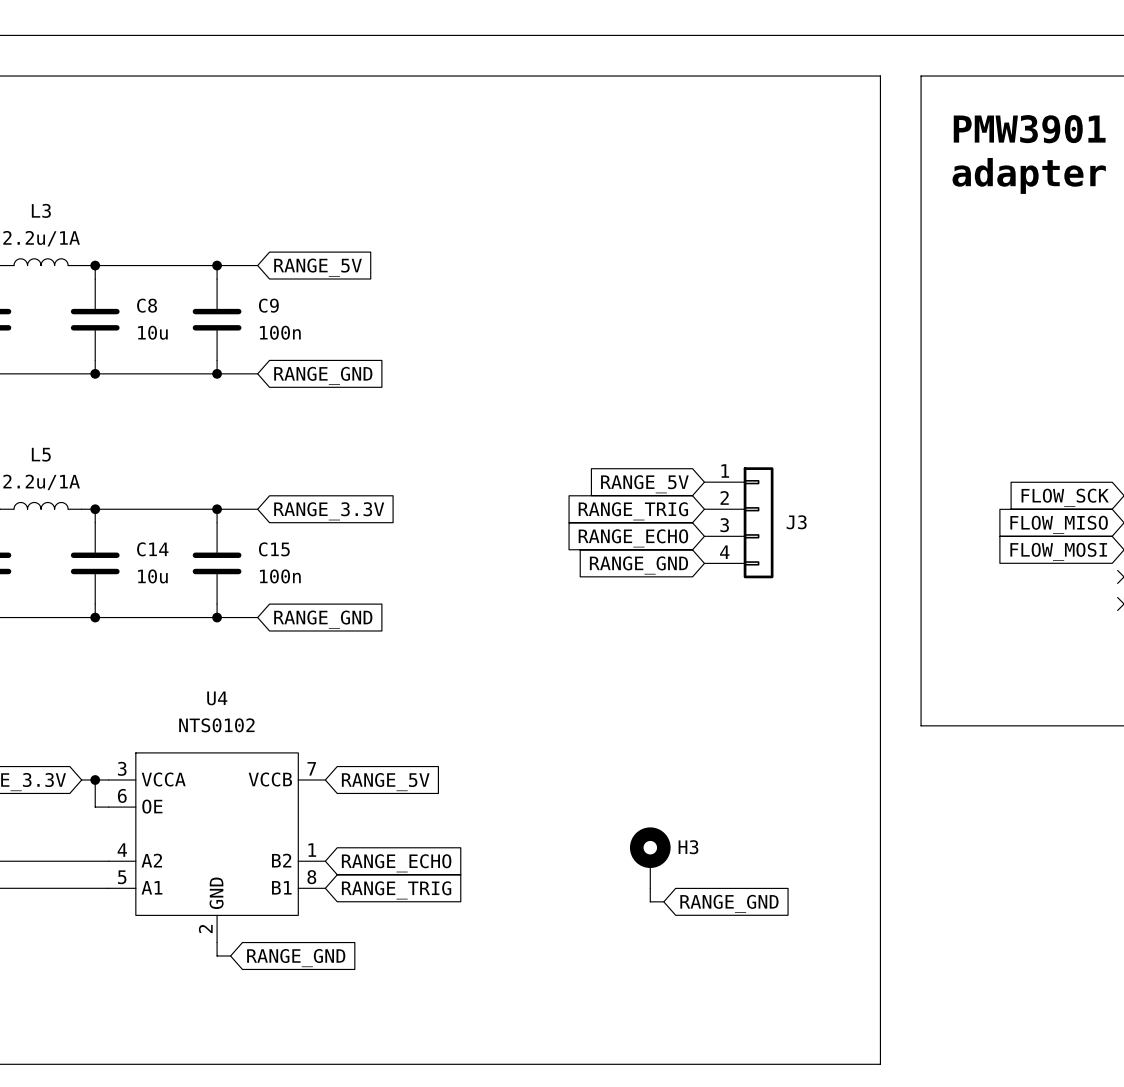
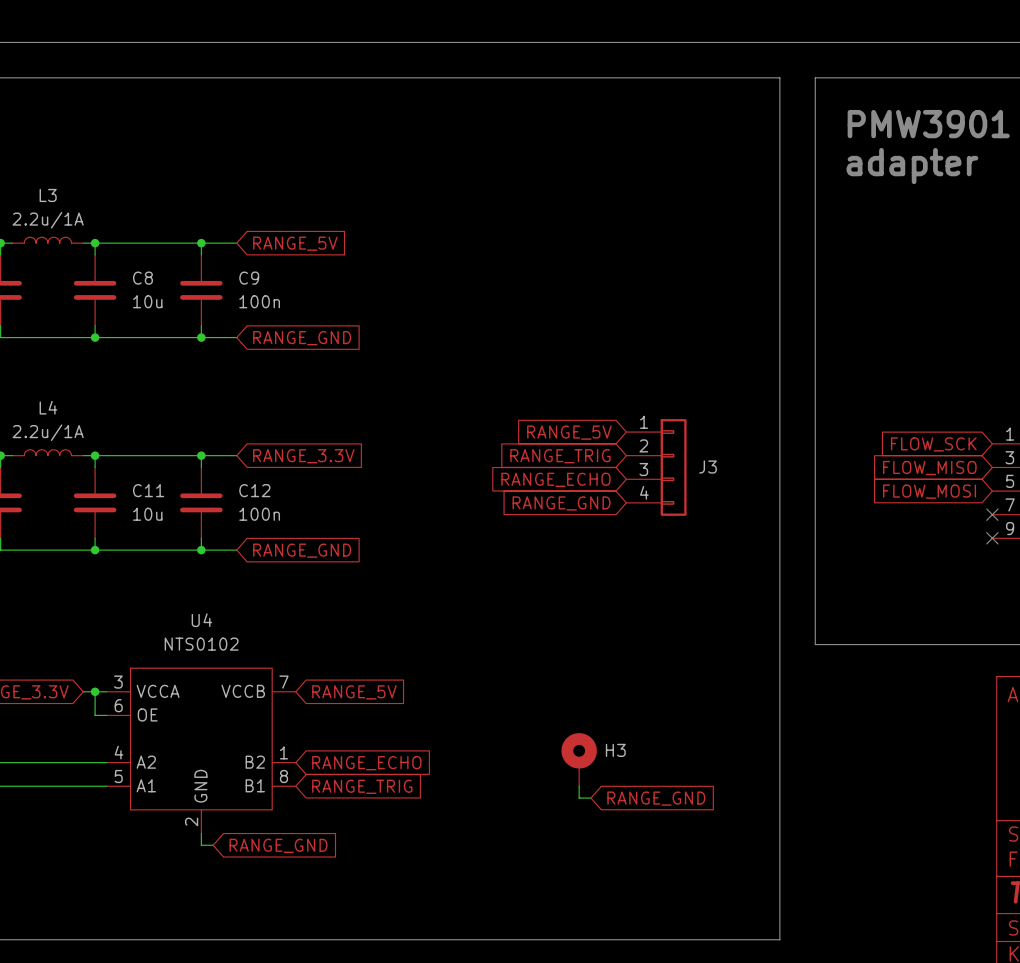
L5 name: L5 (41, 454) -> L4 (48, 407)
C14 name: C14 (152, 549) -> C11 (148, 490)
C15 name: C15 (274, 549) -> C12 (254, 490)

